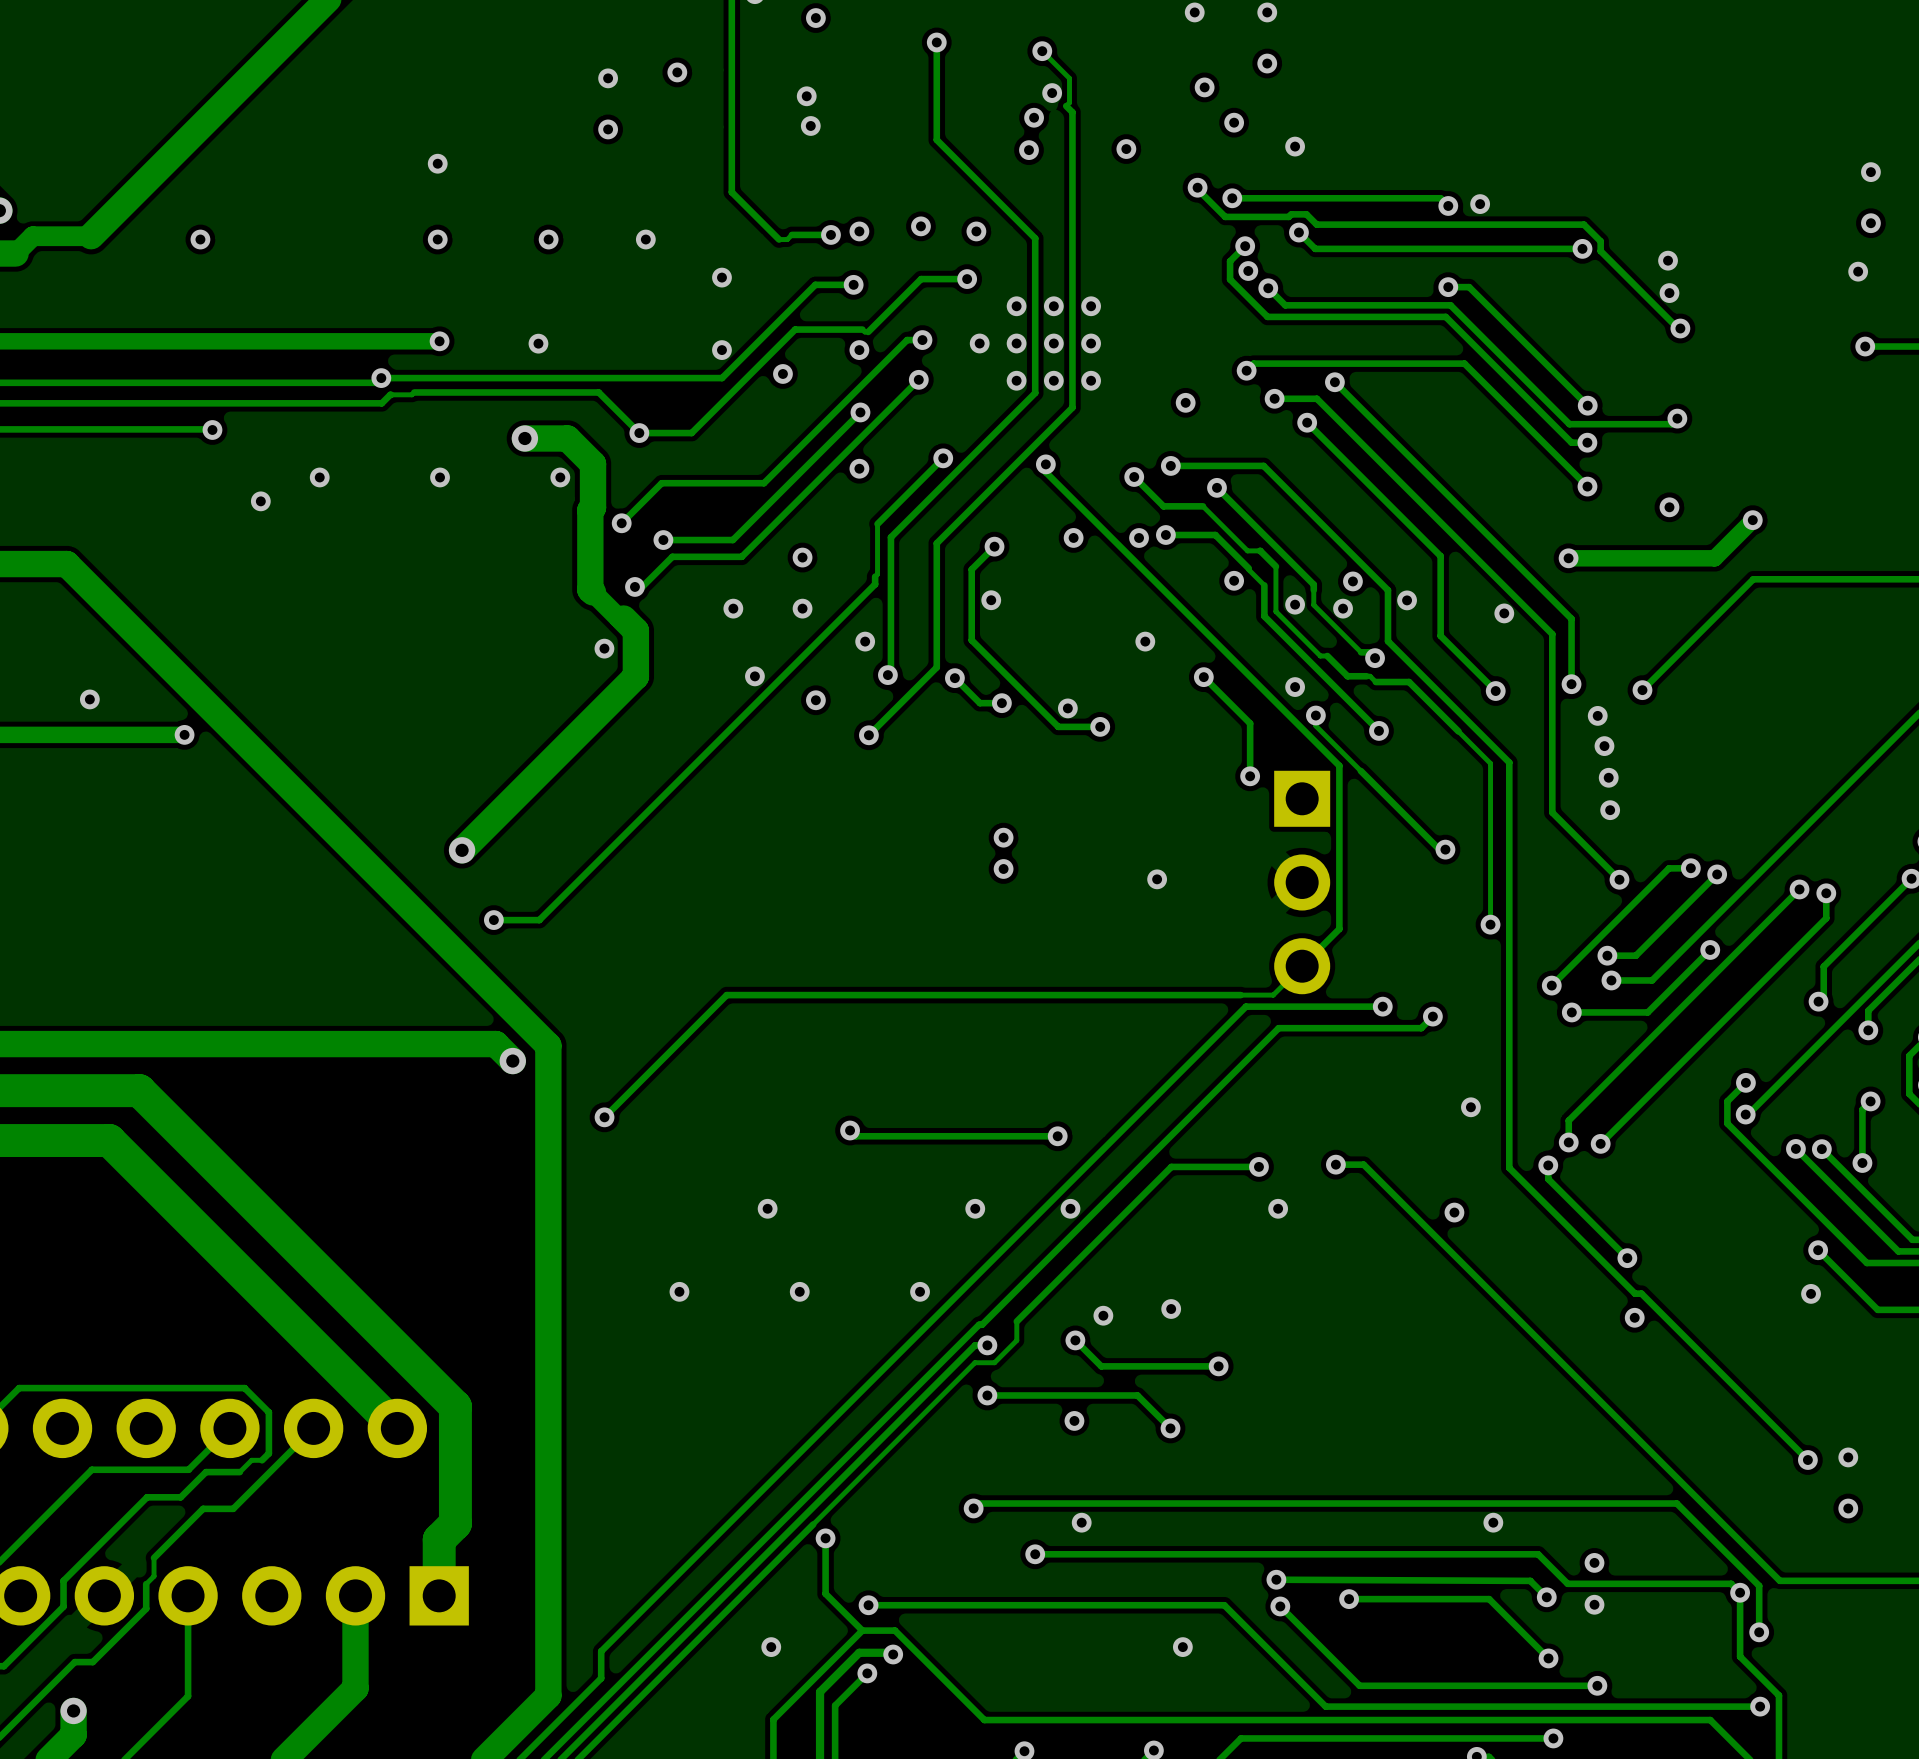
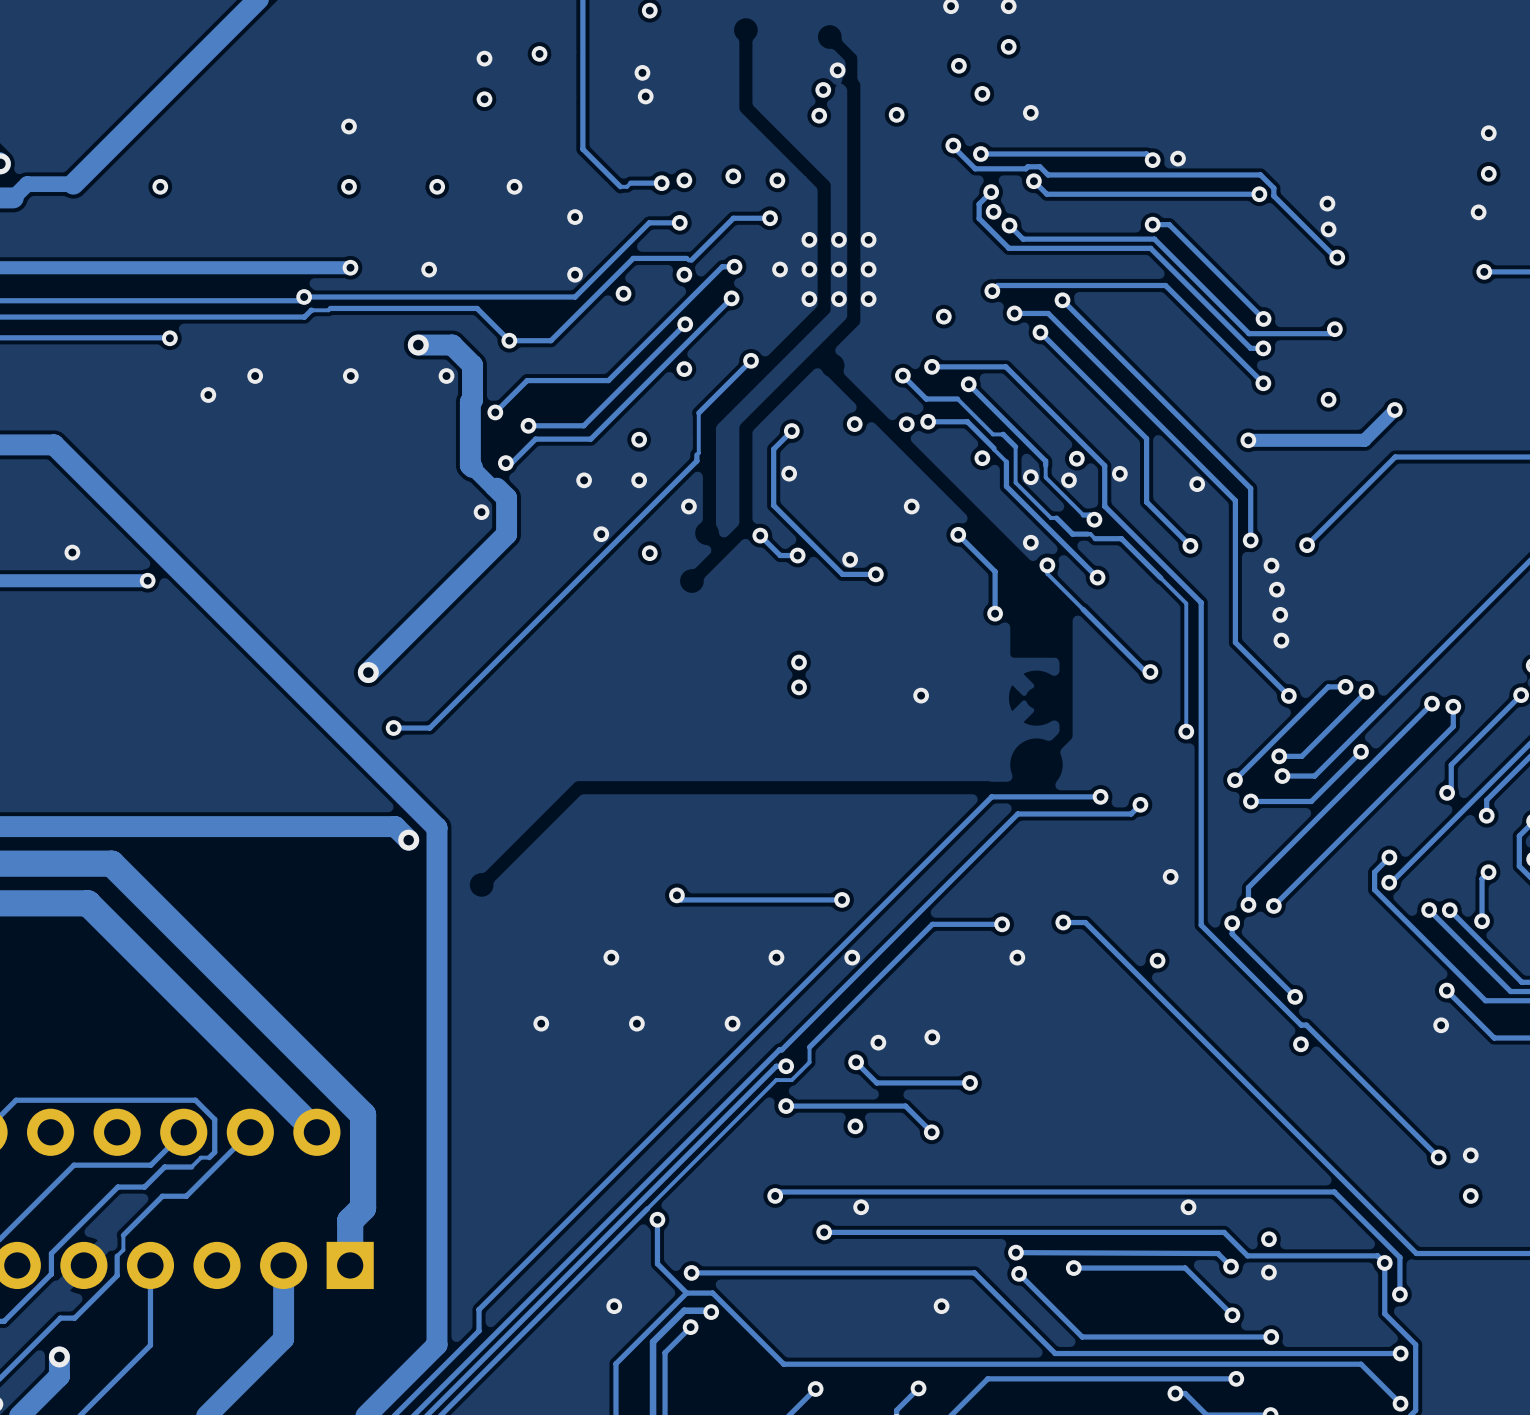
track: (936, 42) (936, 139) (1035, 238) (1035, 393) (890, 537) (890, 672) (887, 675) -> none
via: (936, 42) -> none
track: (1042, 51) (1069, 78) (1069, 102) (1066, 106) (1072, 112) (1072, 407) (936, 543) (936, 667) (868, 735) -> none
via: (1042, 51) -> none
track: (1045, 464) (1045, 472) (1339, 765) (1339, 929) (1273, 995) (726, 995) (604, 1117) -> none
via: (1045, 464) -> none
via: (887, 675) -> none
via: (868, 735) -> none
part: (1302, 882) -> none
via: (604, 1117) -> none

